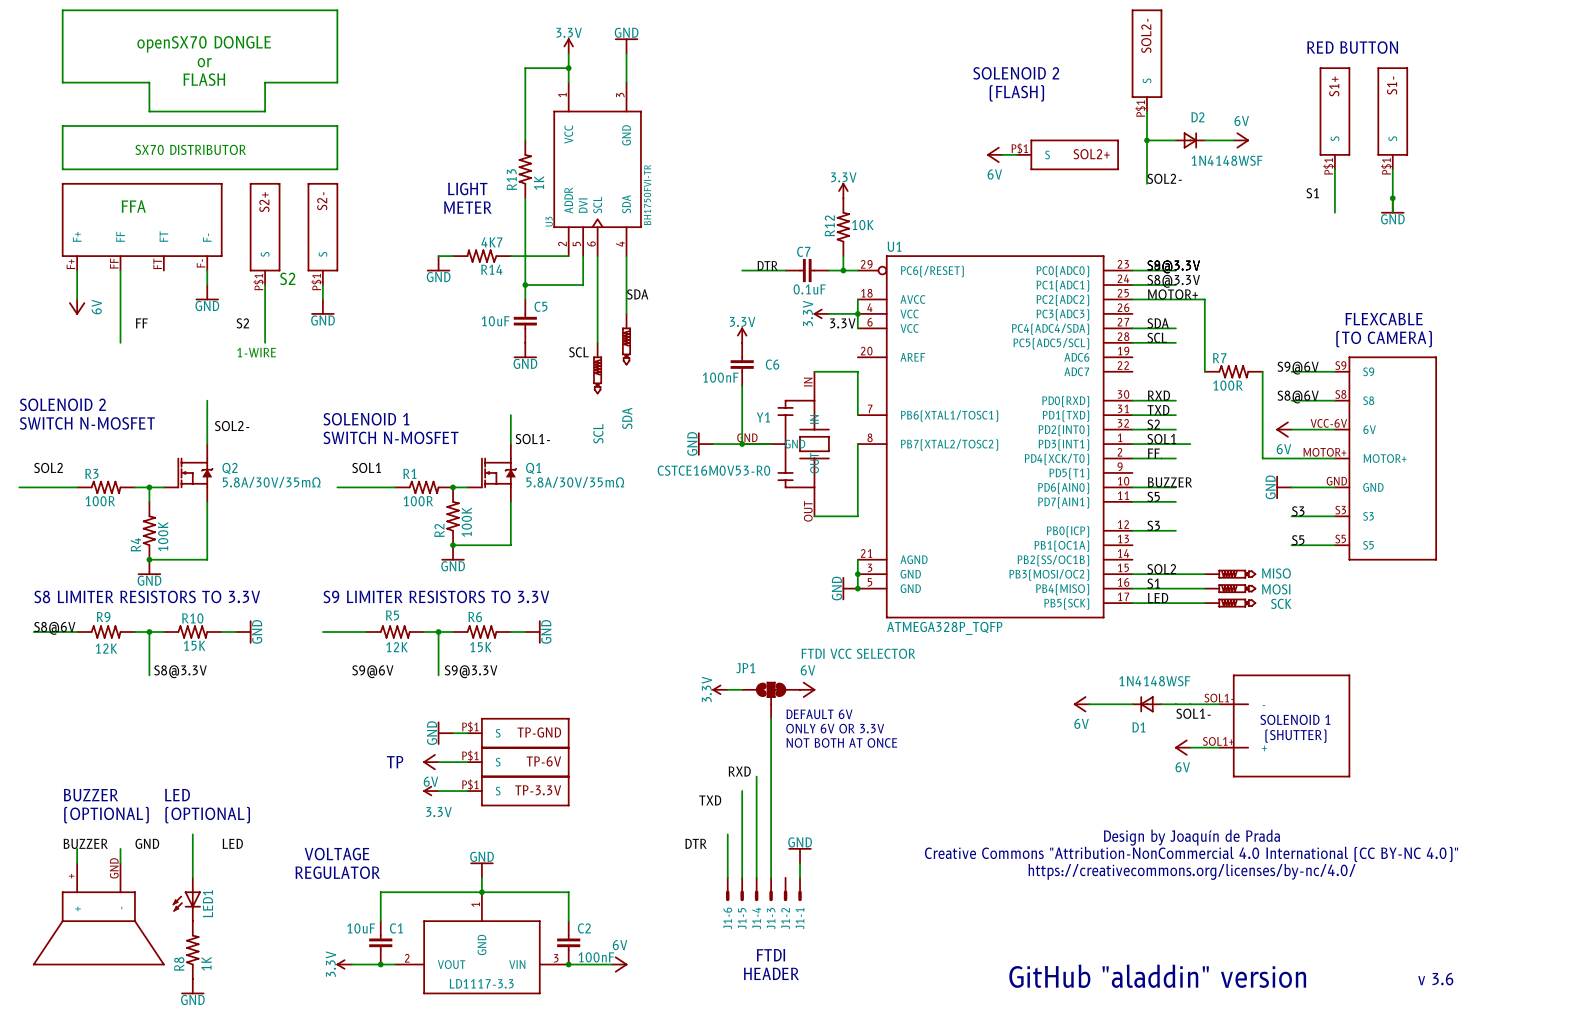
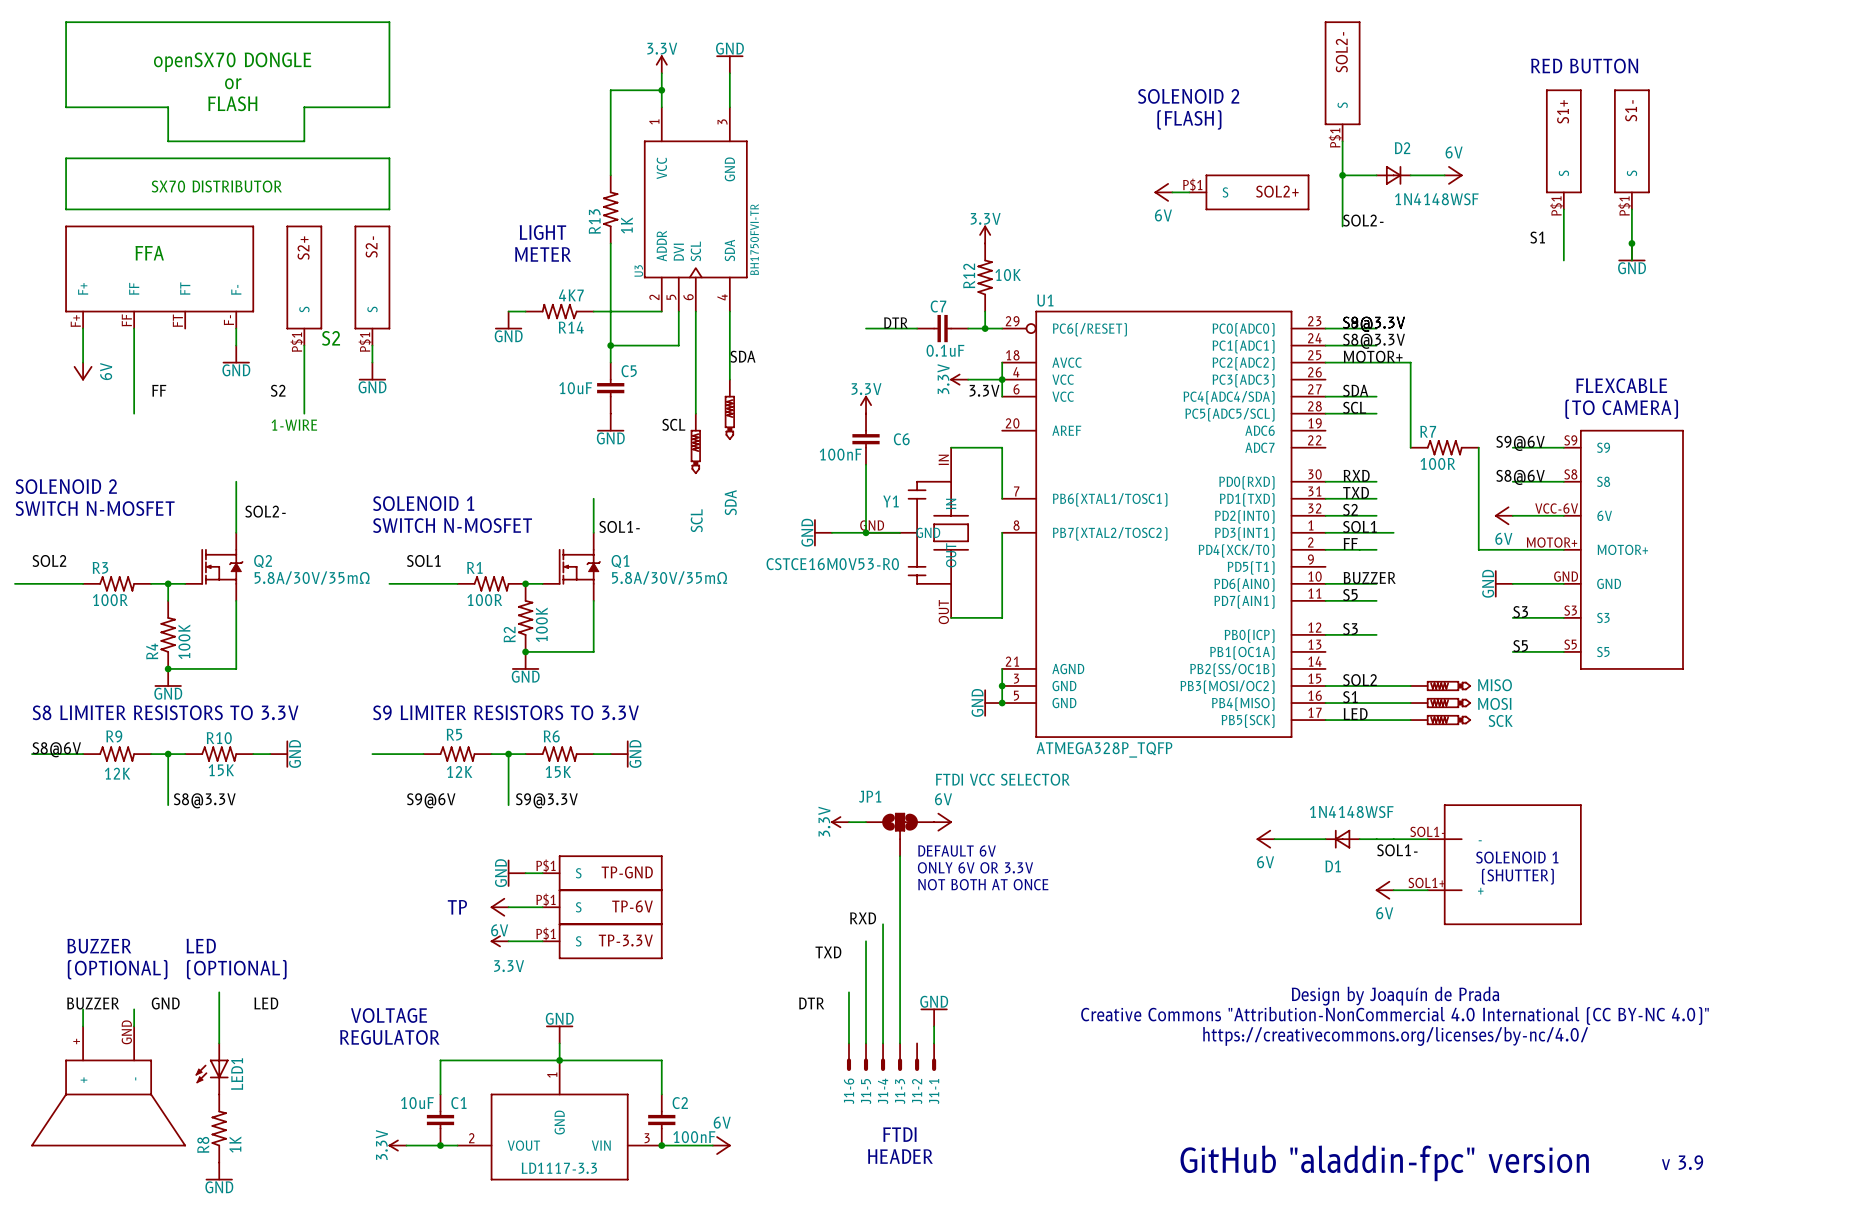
text: GitHub "aladdin" version (1157, 976) -> GitHub "aladdin-fpc" version (1384, 1163)
text: v 3.6 (1435, 979) -> v 3.9 (1682, 1162)

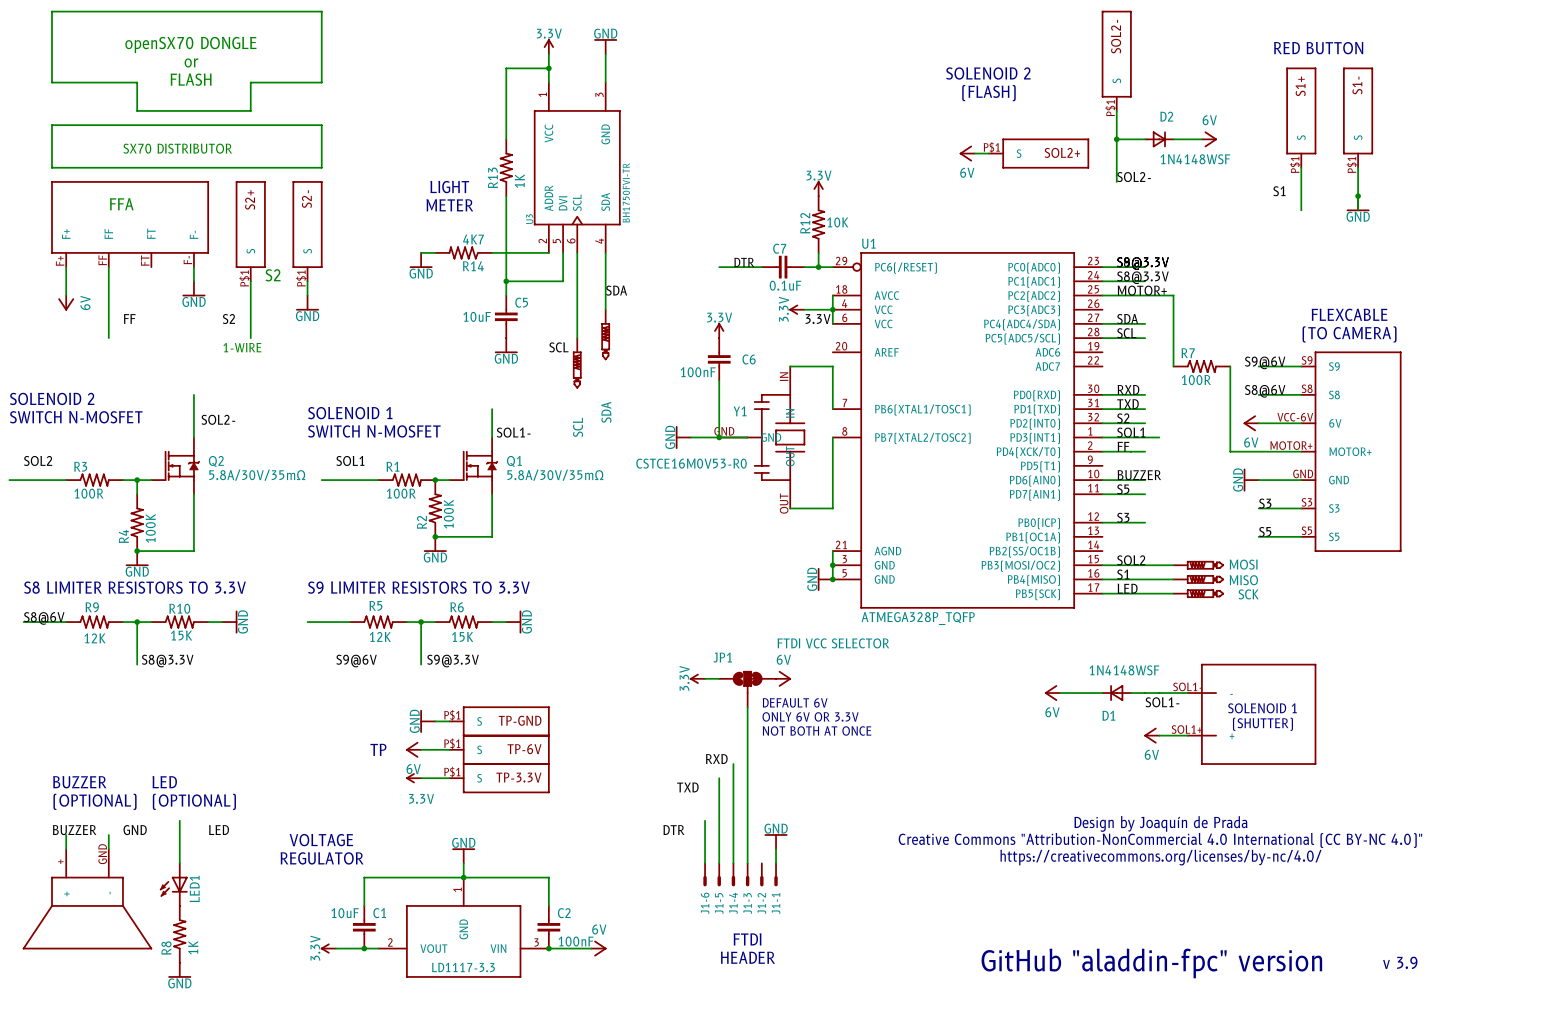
MISO name: MISO (1494, 685) -> MOSI (1243, 564)
MOSI name: MOSI (1494, 703) -> MISO (1243, 580)

